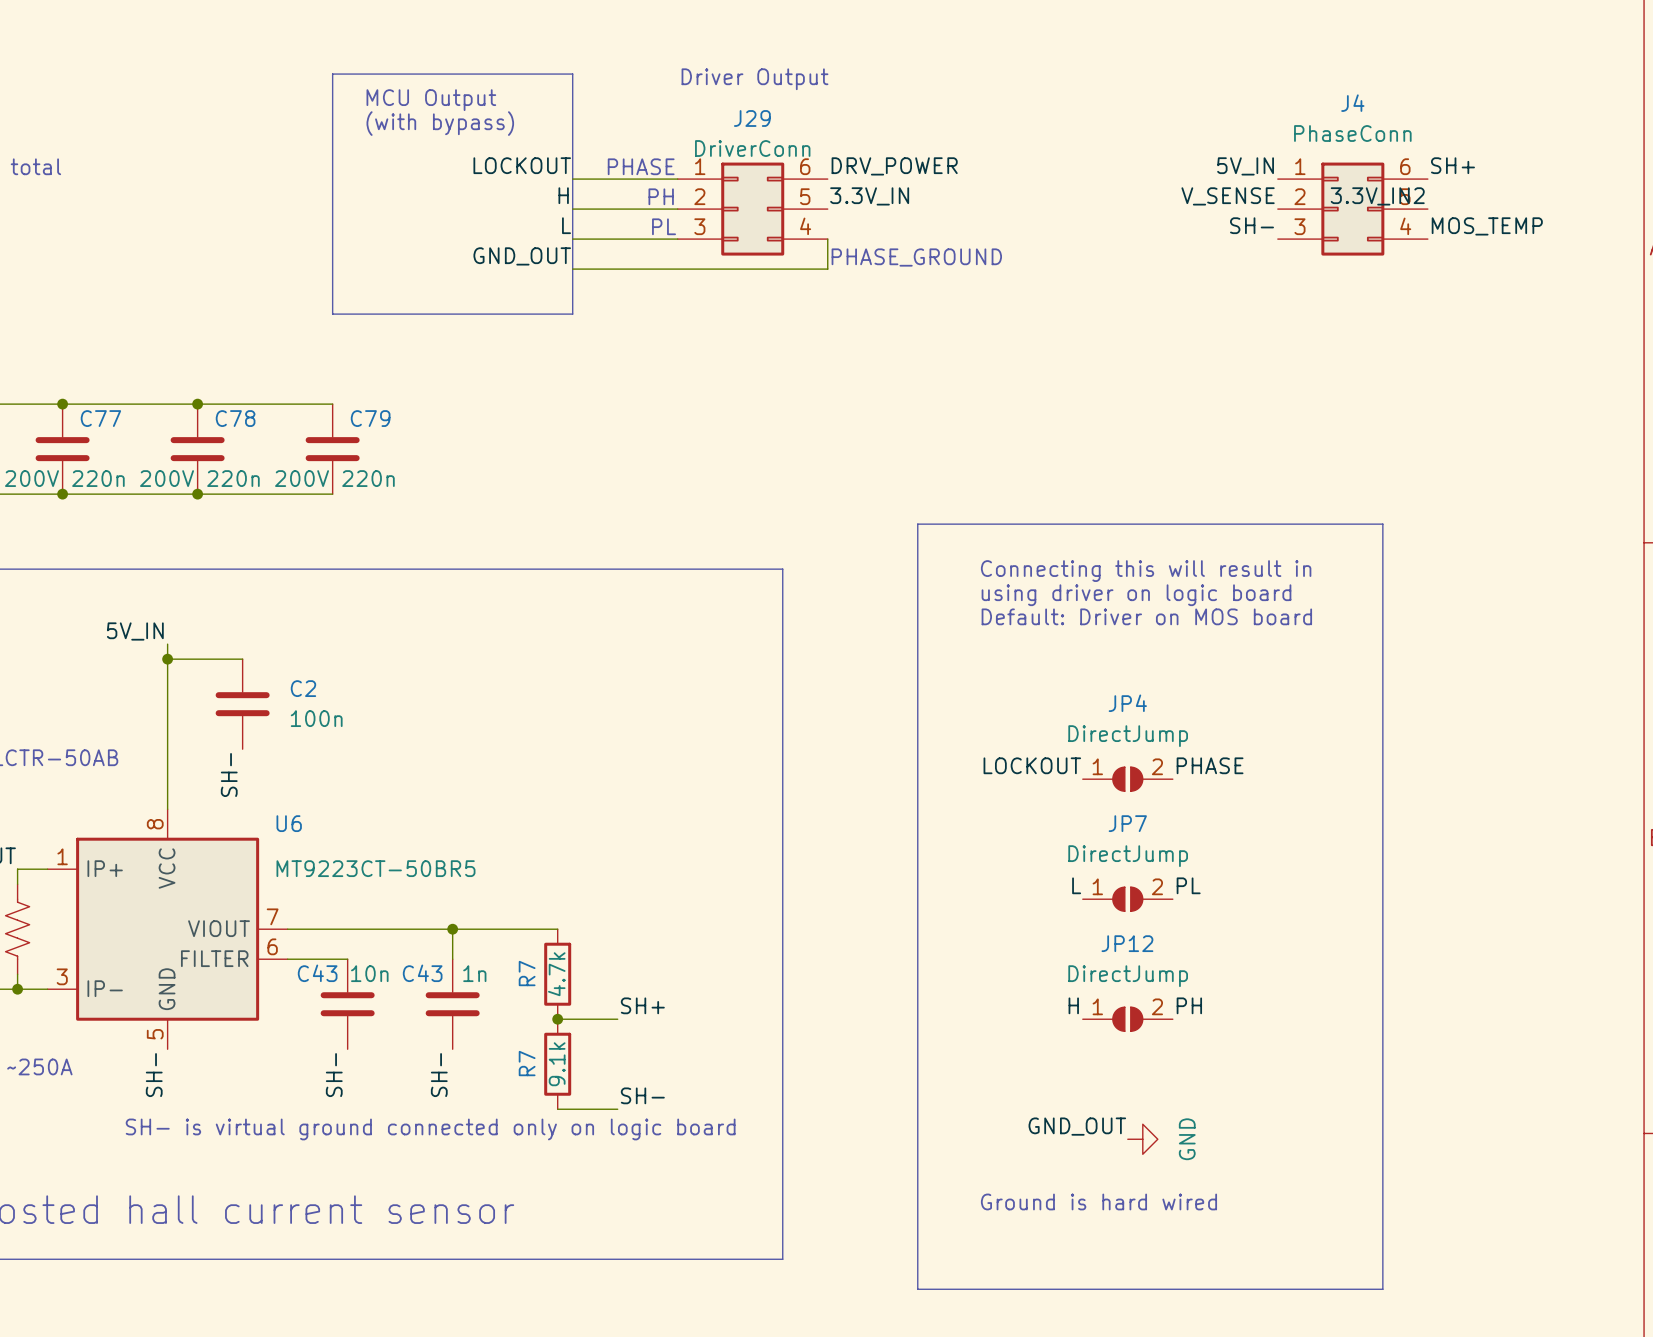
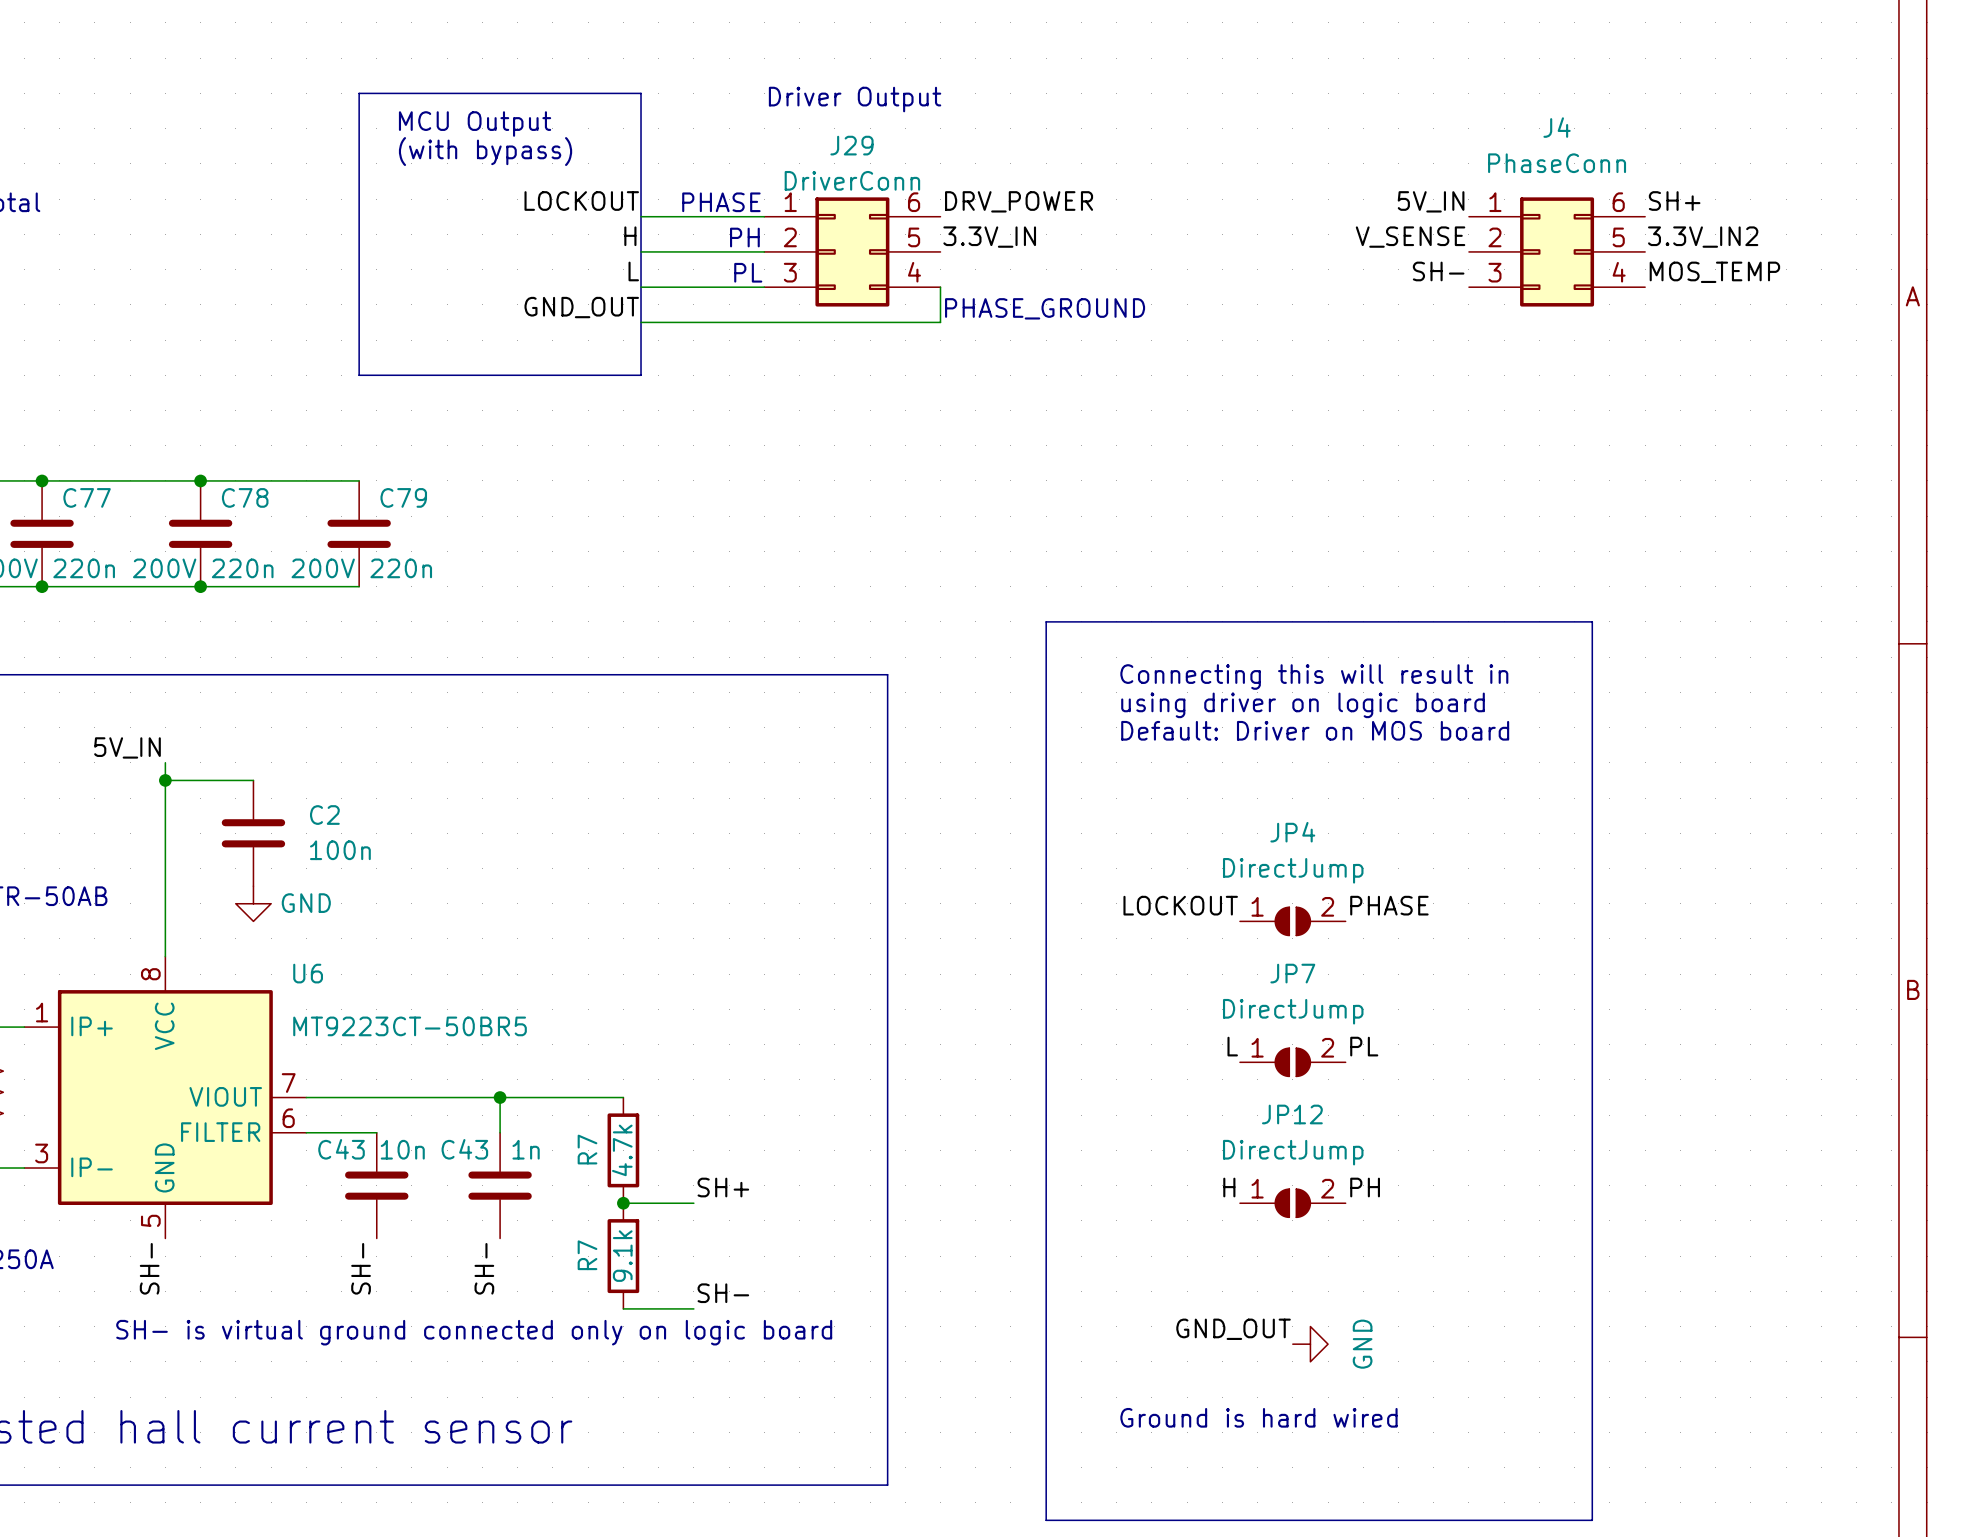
label position: 3.3V_IN2 (1377, 196) -> 3.3V_IN2 (1703, 237)
power symbol: none -> GND (253, 903)
label: SH- (229, 775) -> none

